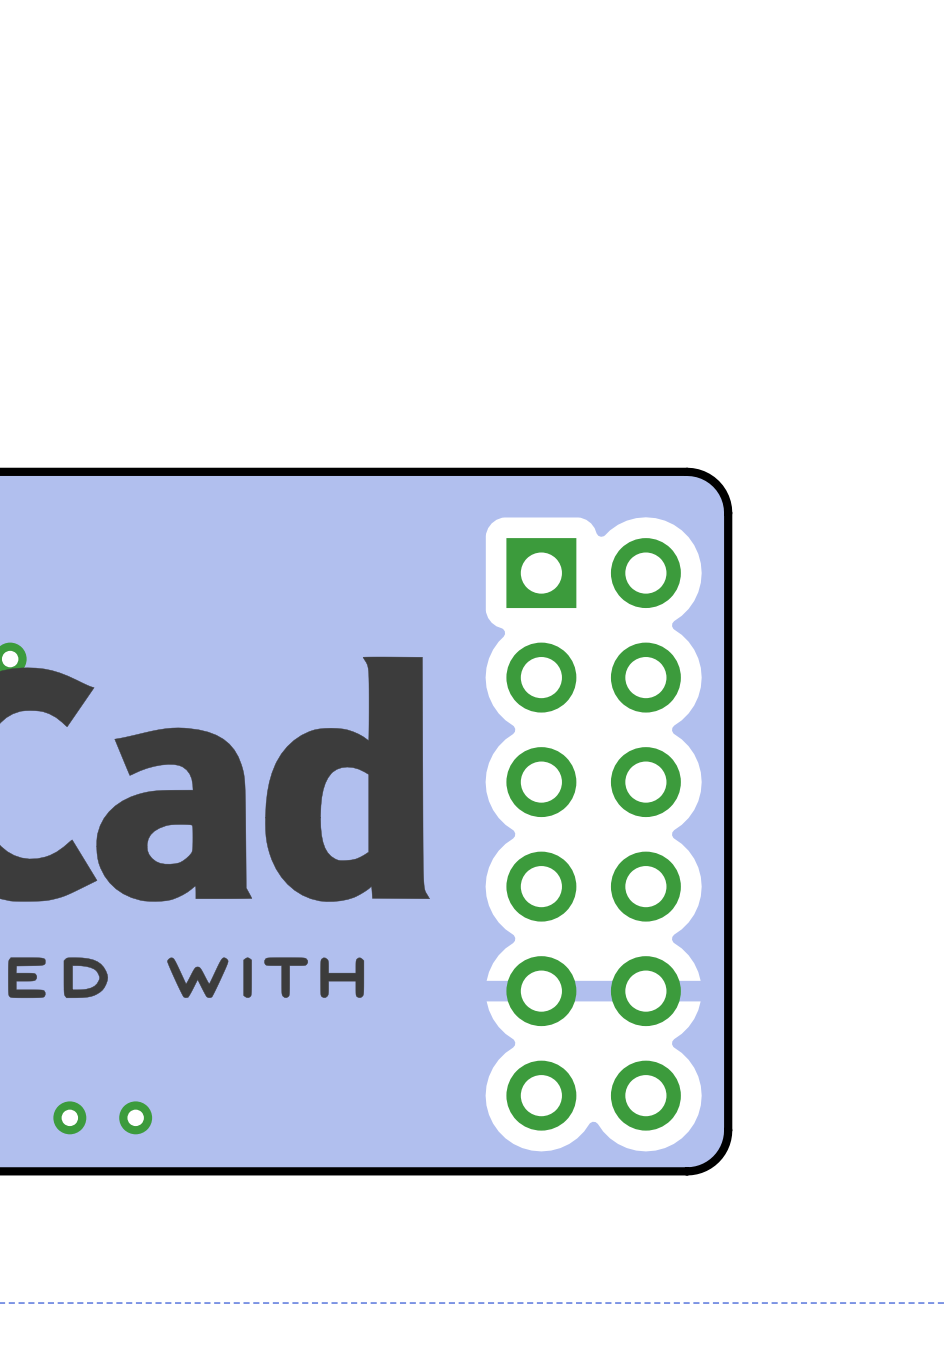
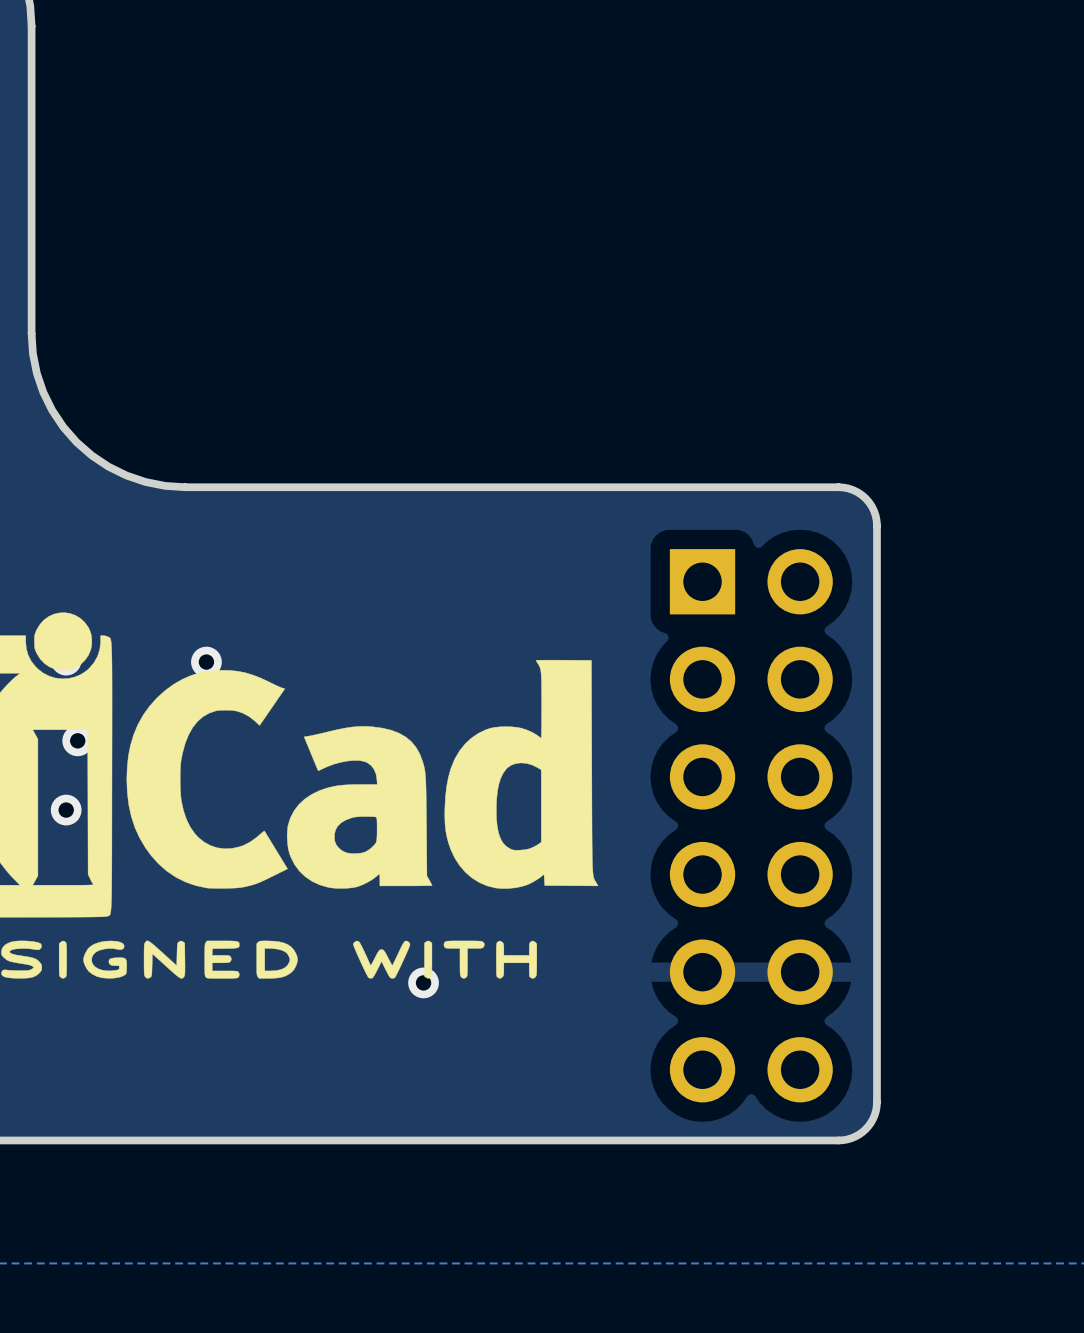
via: none -> (423, 982)
via: (69, 1117) -> none
via: (135, 1117) -> none

